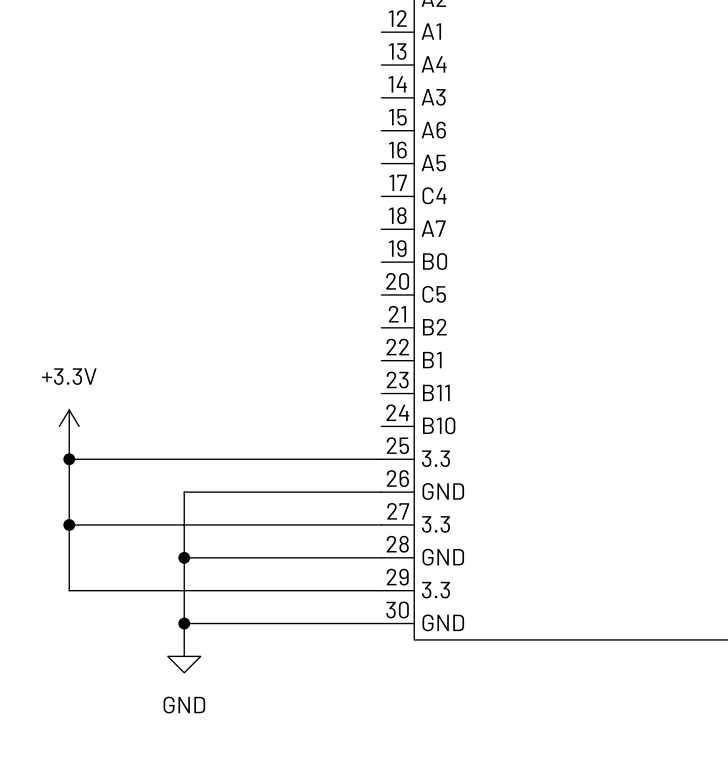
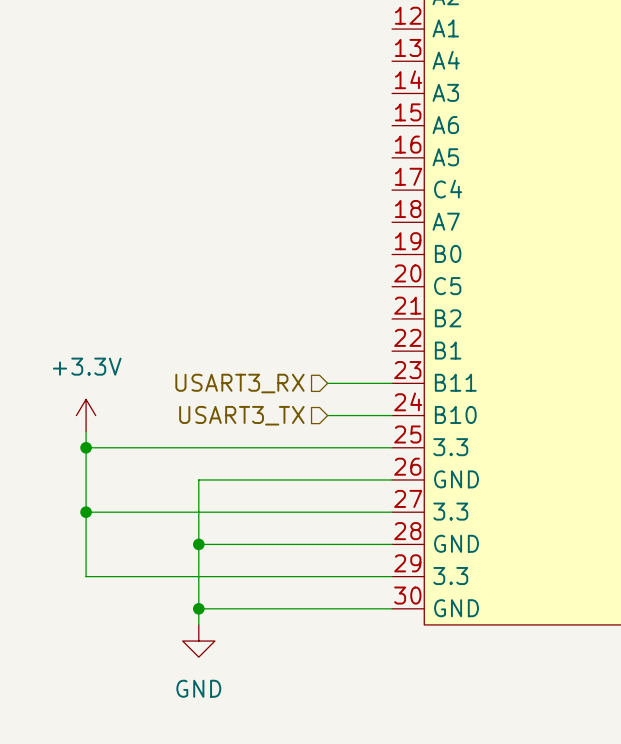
hierarchical label: none -> USART3_RX (239, 383)
wire: none -> (327, 383) (392, 383)
hierarchical label: none -> USART3_TX (241, 415)
wire: none -> (327, 415) (392, 415)

